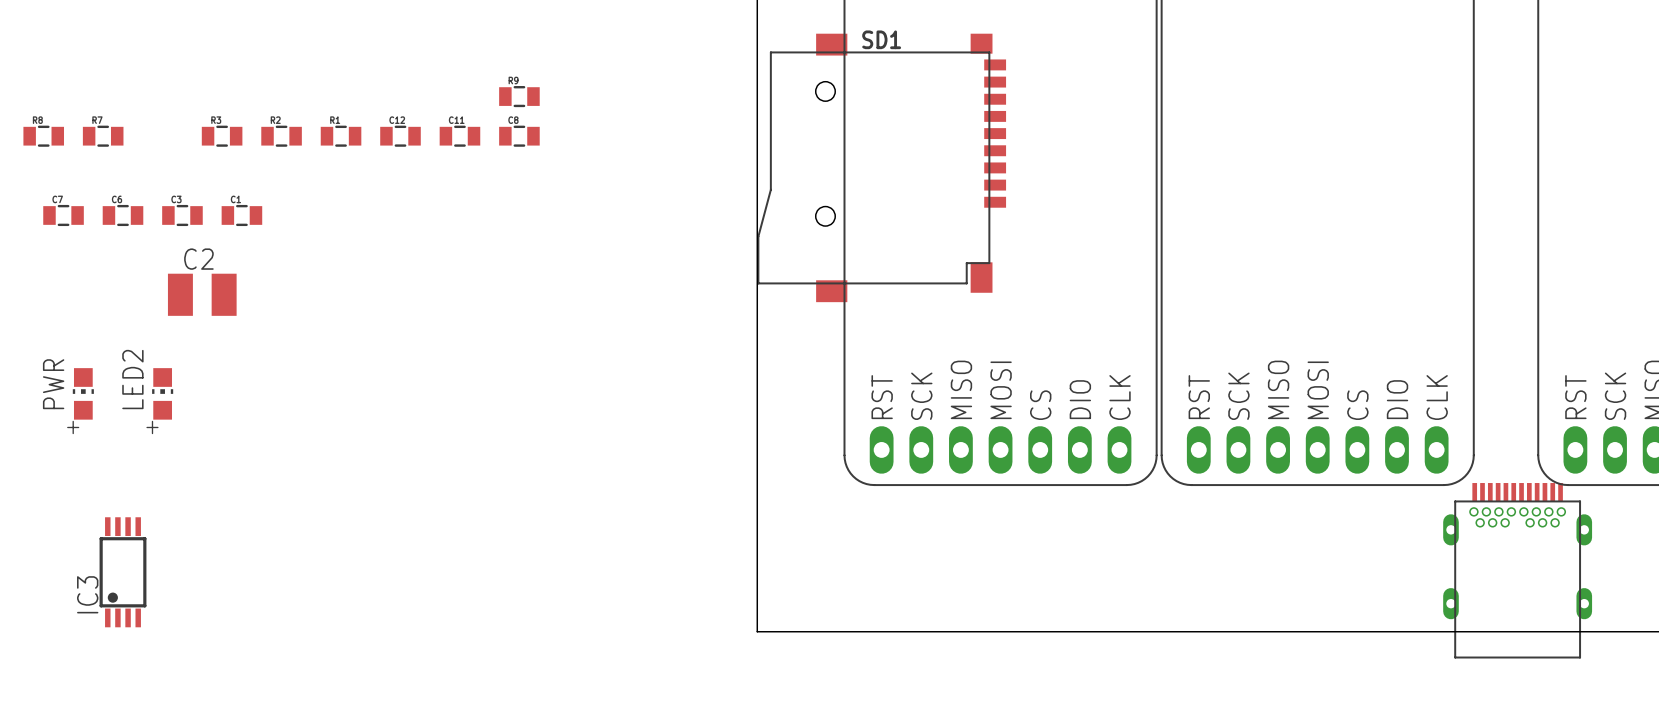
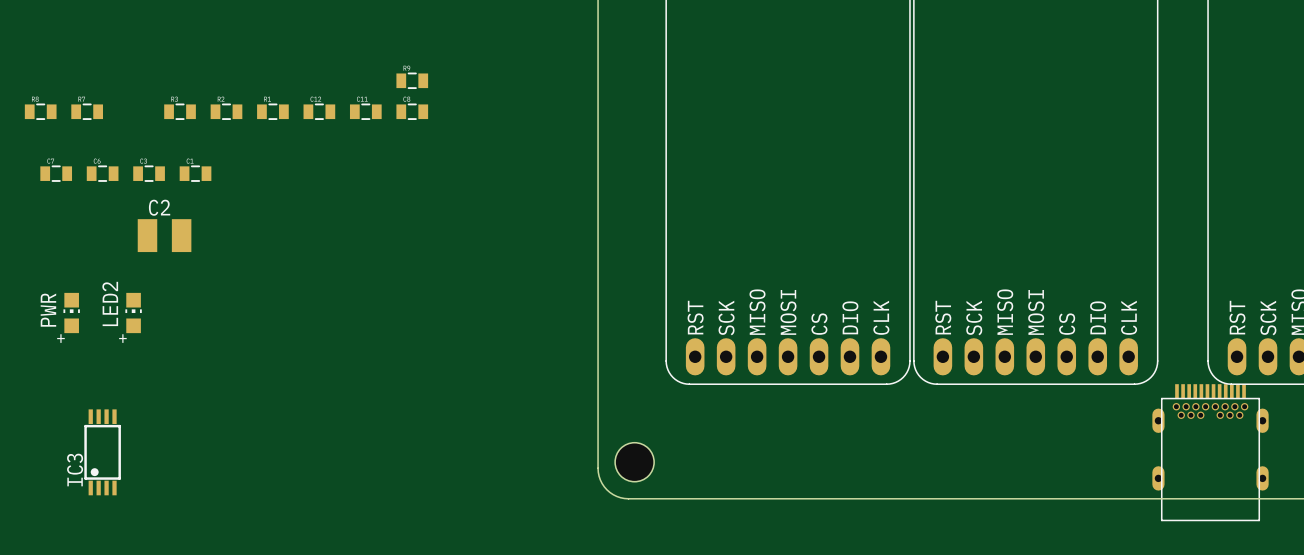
SD1: (881, 167) -> none
part position: (1517, 570) -> (1210, 452)
part: none -> (634, 462)
board edge: (757, 592) (757, 631) (796, 631) -> (598, 468) (600, 479) (606, 489) (616, 496) (628, 498)

